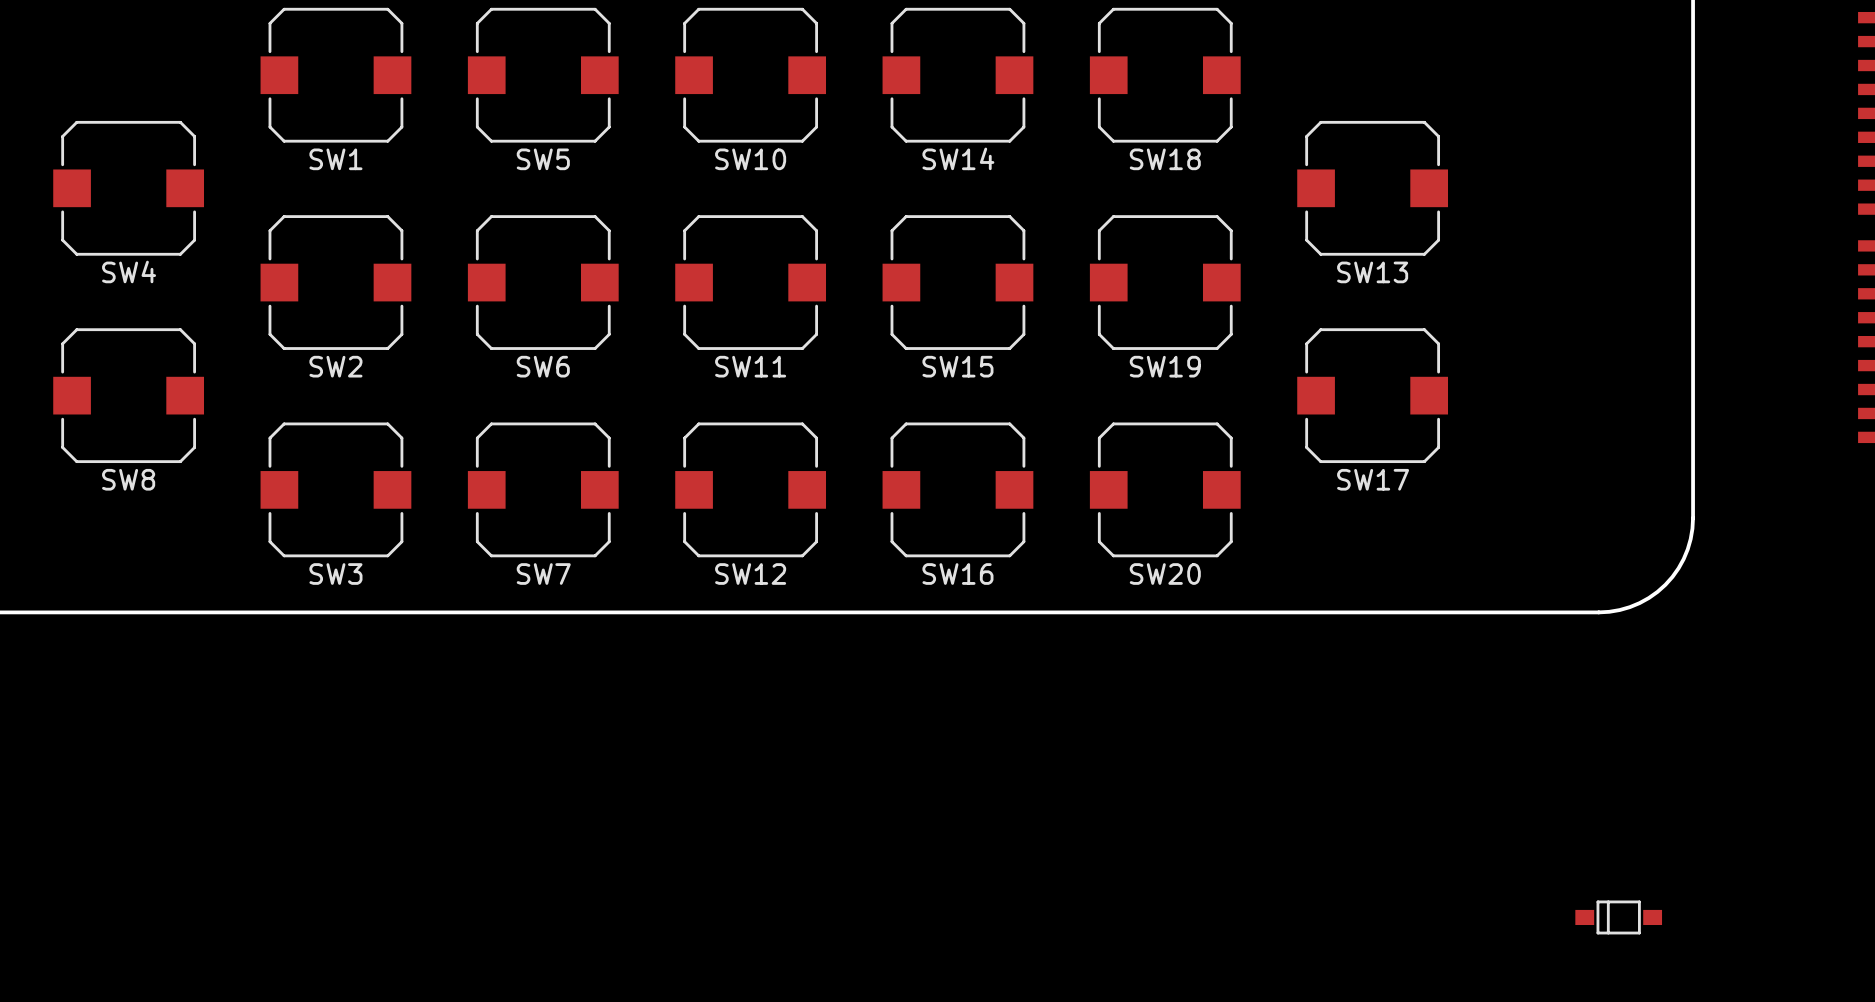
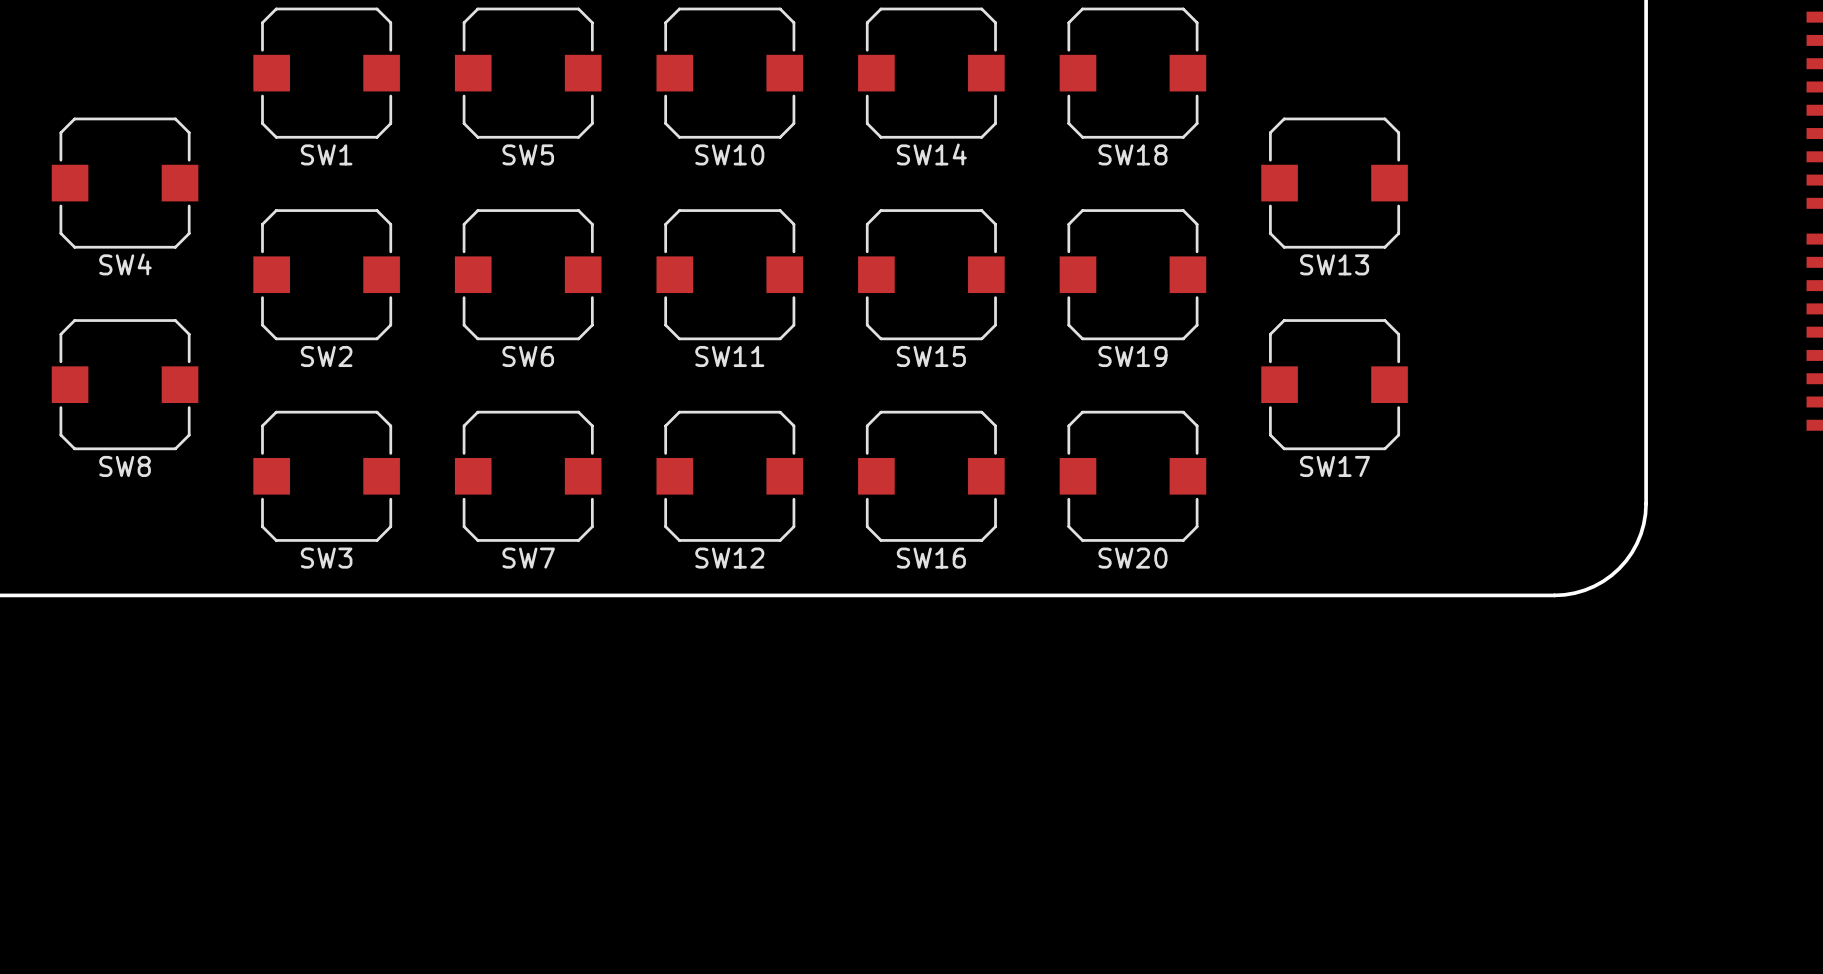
part: (1618, 917) -> none

